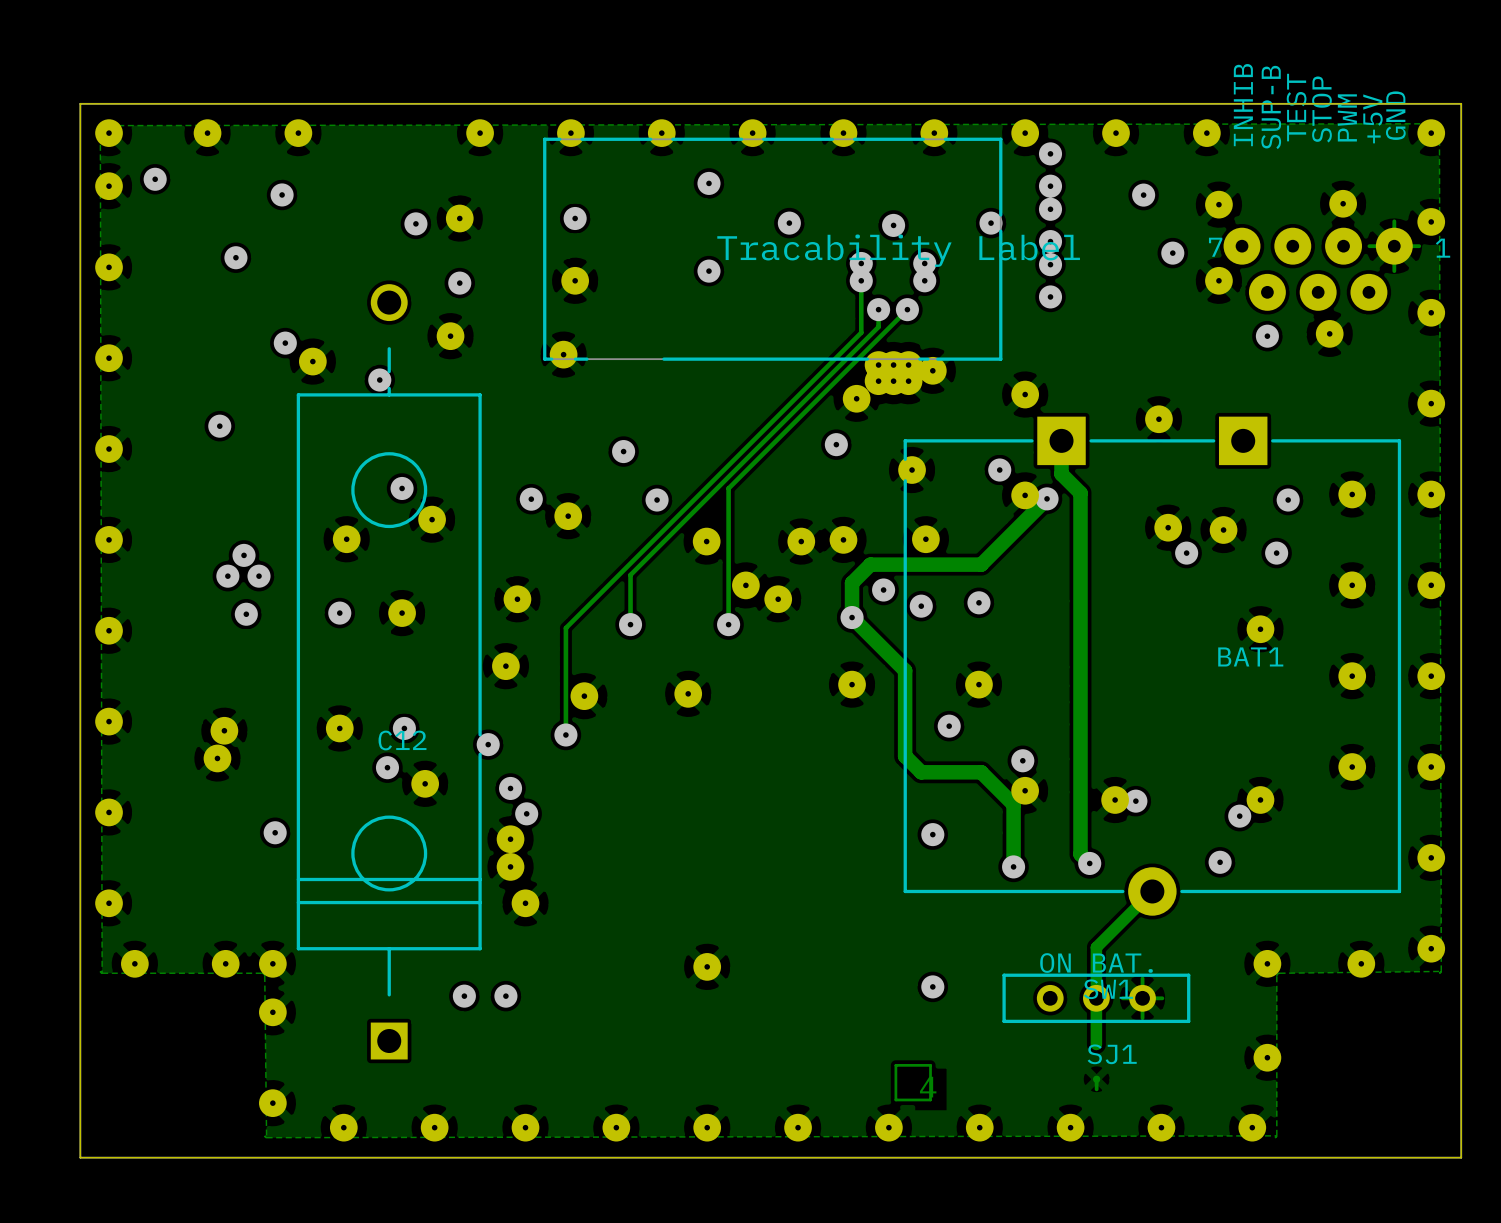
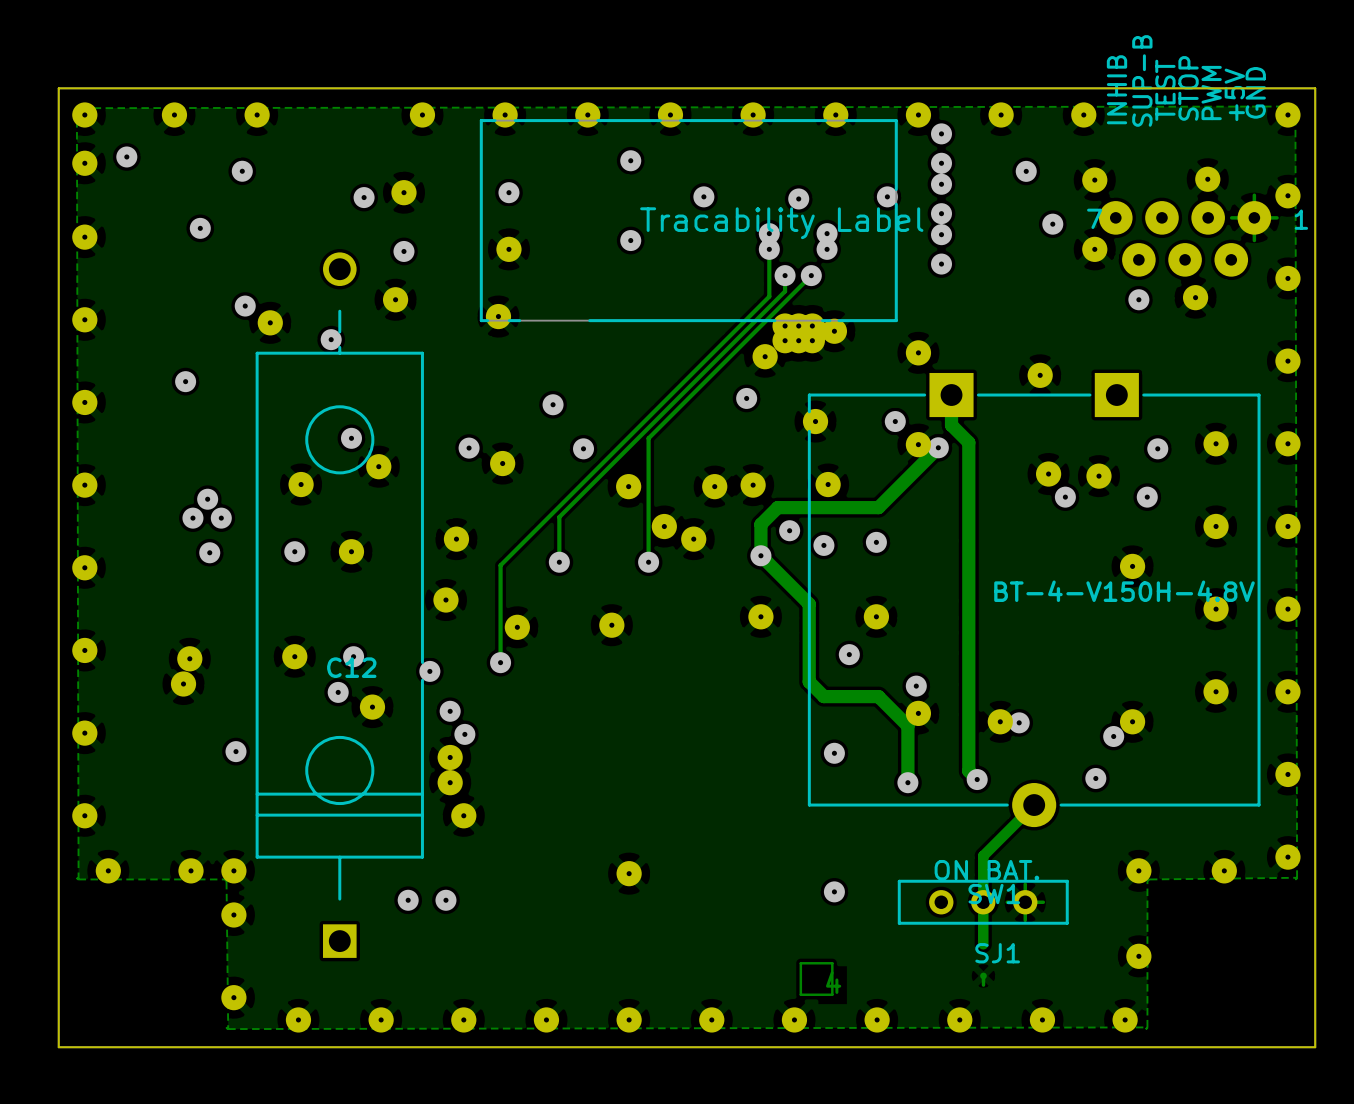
BAT1 name: BAT1 (1250, 656) -> BT-4-V150H-4.8V (1124, 591)

